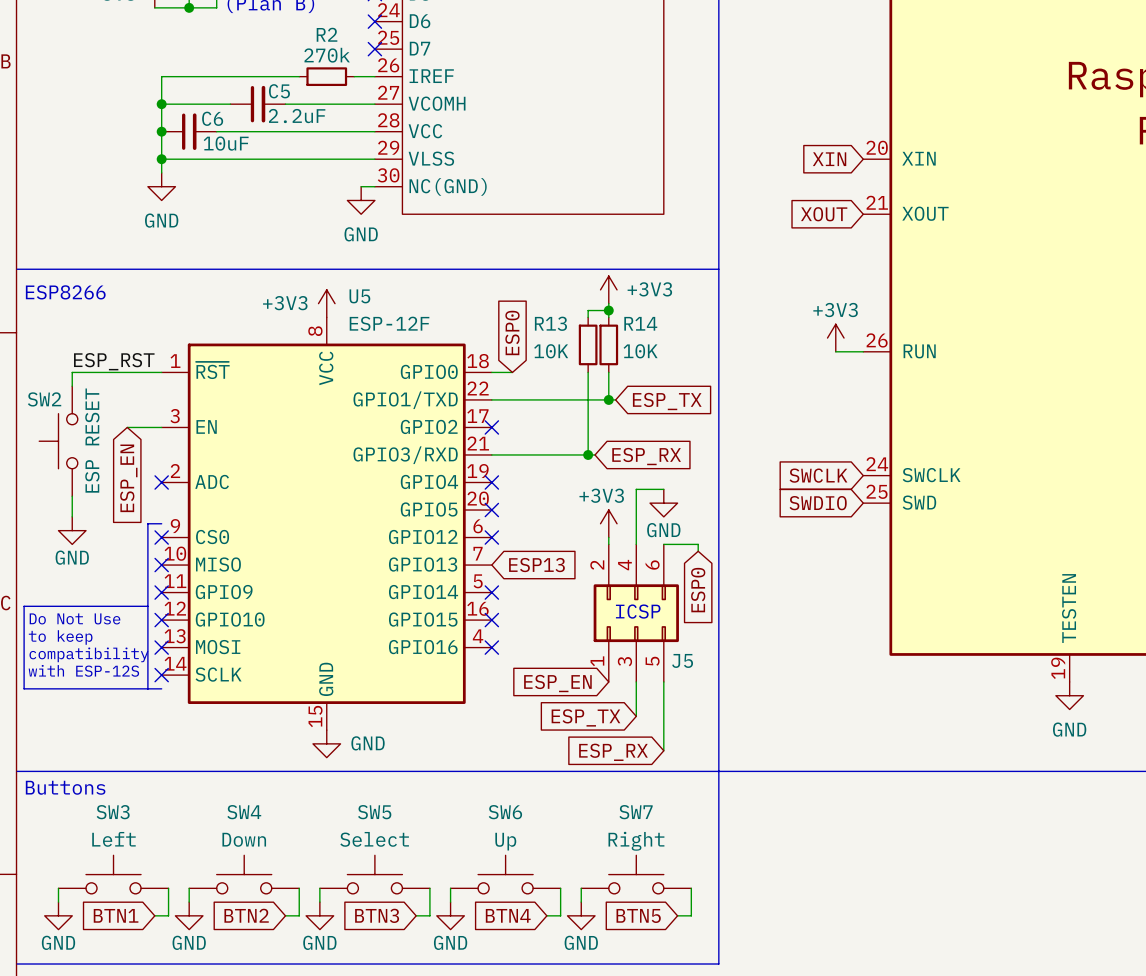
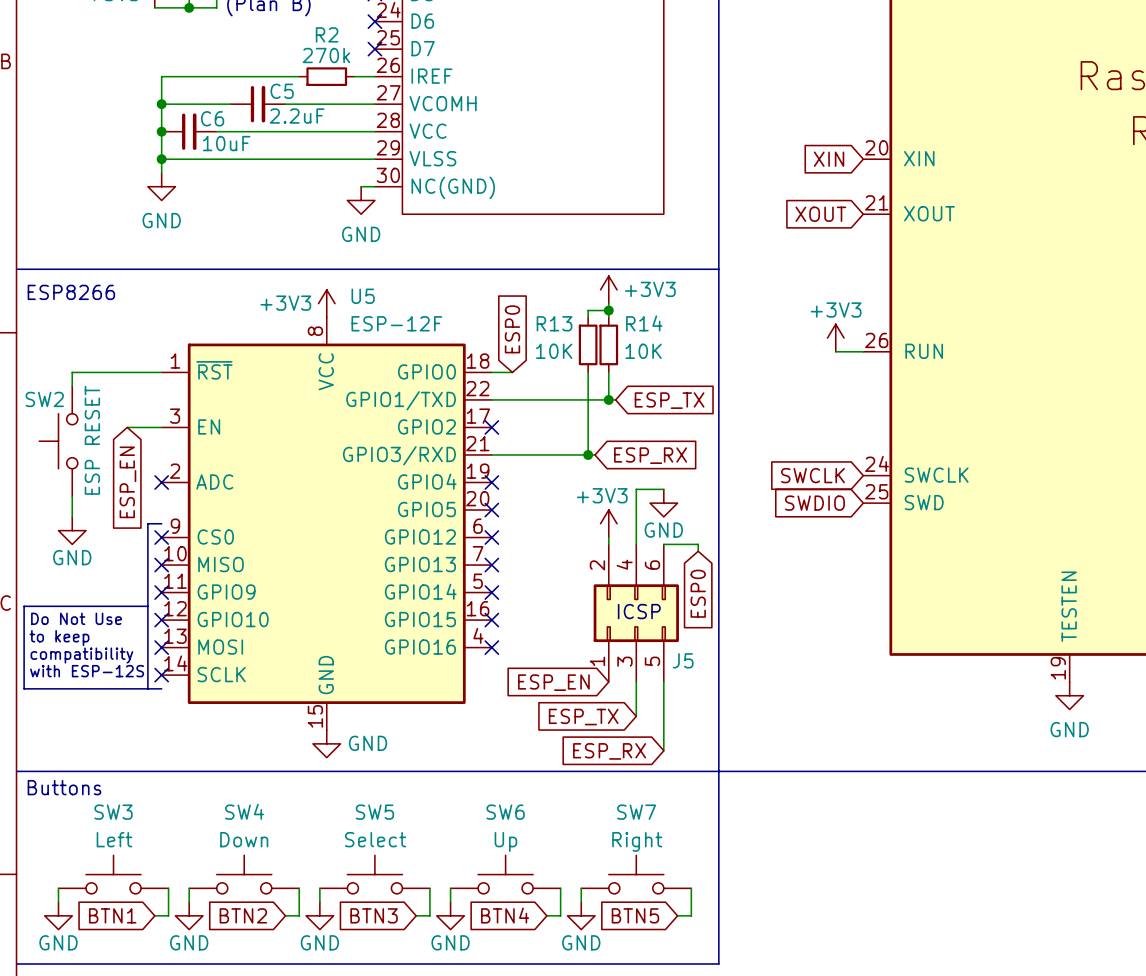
label: ESP_RST (114, 361) -> none
no-connect mark: none -> (491, 565)
global label: ESP13 (536, 565) -> none

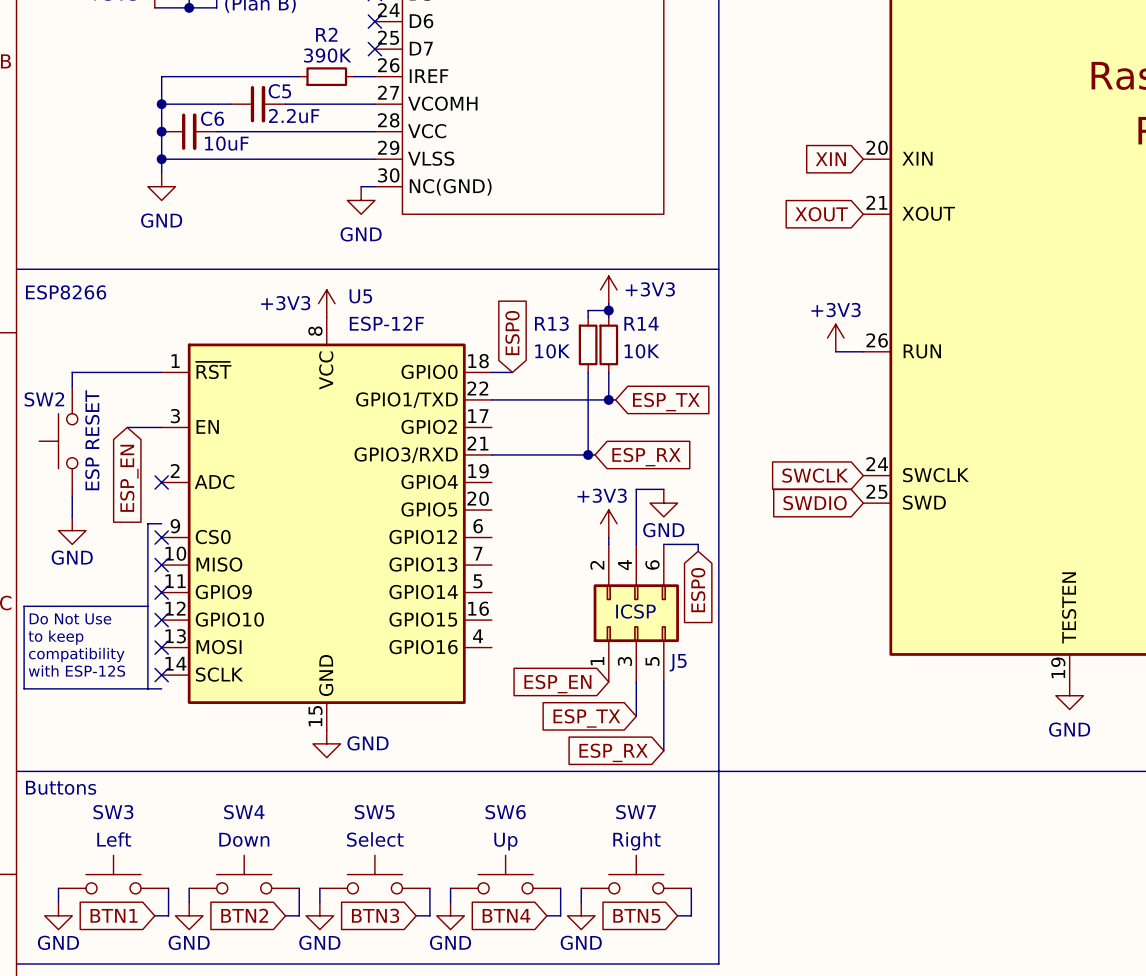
R2 value: 270k (326, 55) -> 390K (327, 55)
no-connect mark: (491, 427) -> none
no-connect mark: (491, 482) -> none
no-connect mark: (491, 510) -> none
no-connect mark: (491, 537) -> none
no-connect mark: (491, 565) -> none
no-connect mark: (491, 592) -> none
no-connect mark: (491, 620) -> none
no-connect mark: (491, 647) -> none

